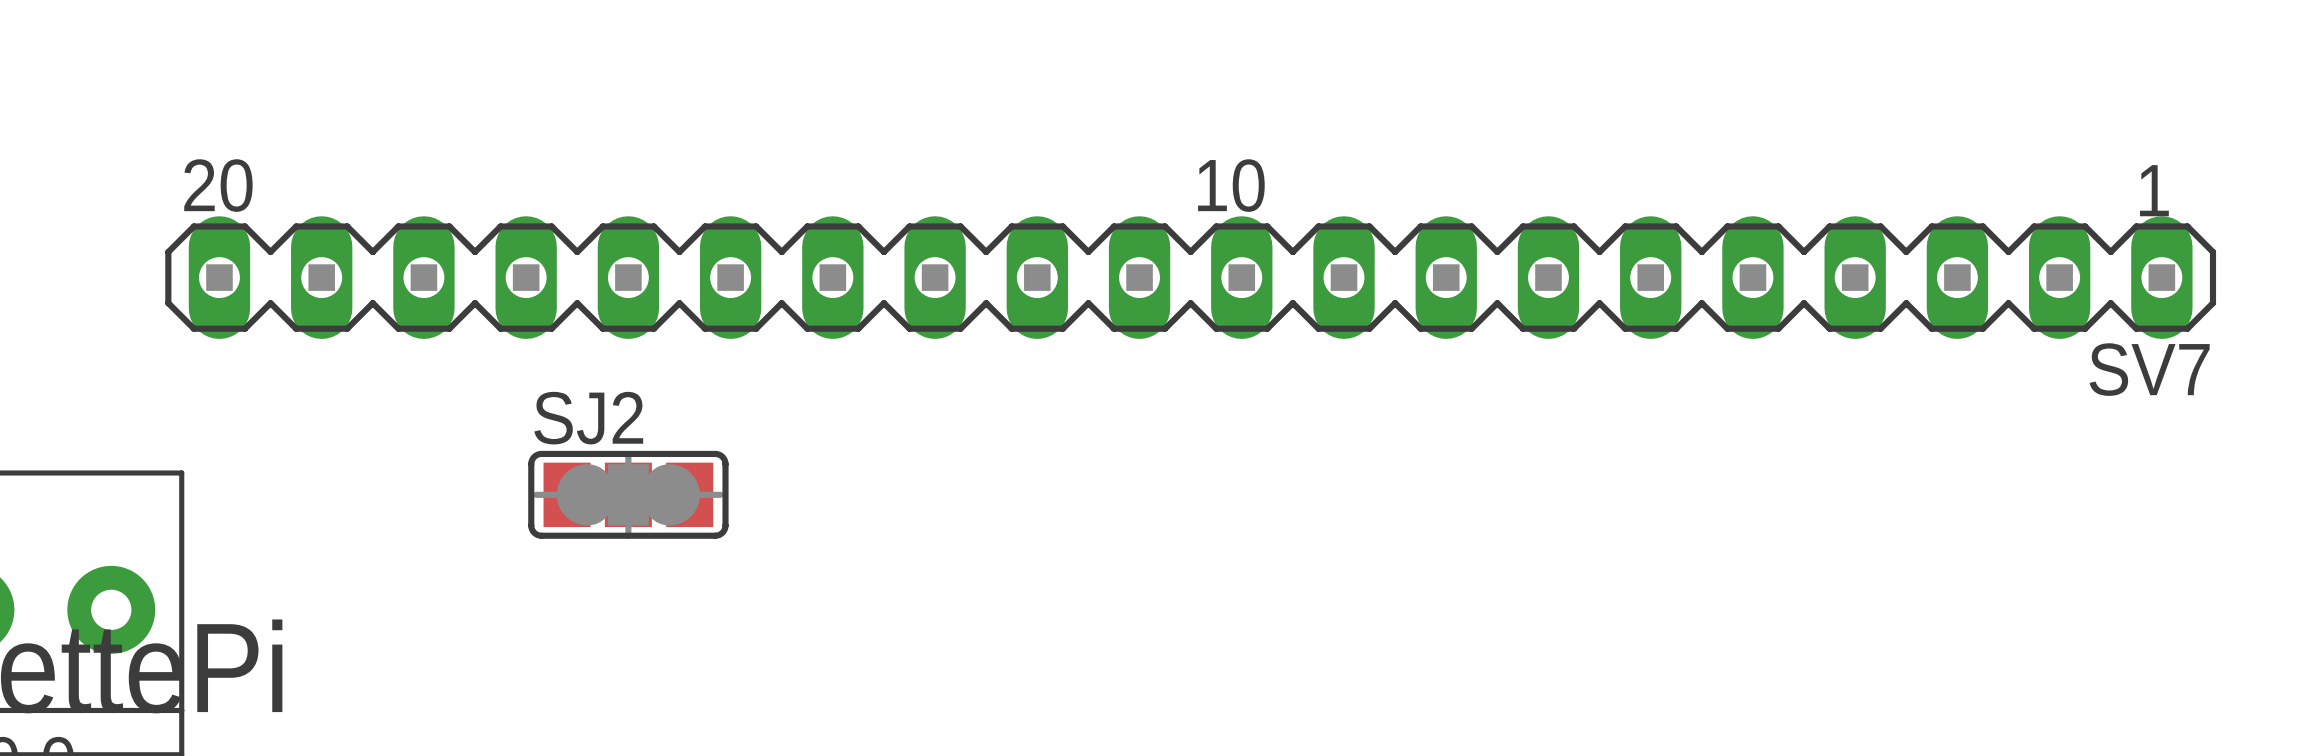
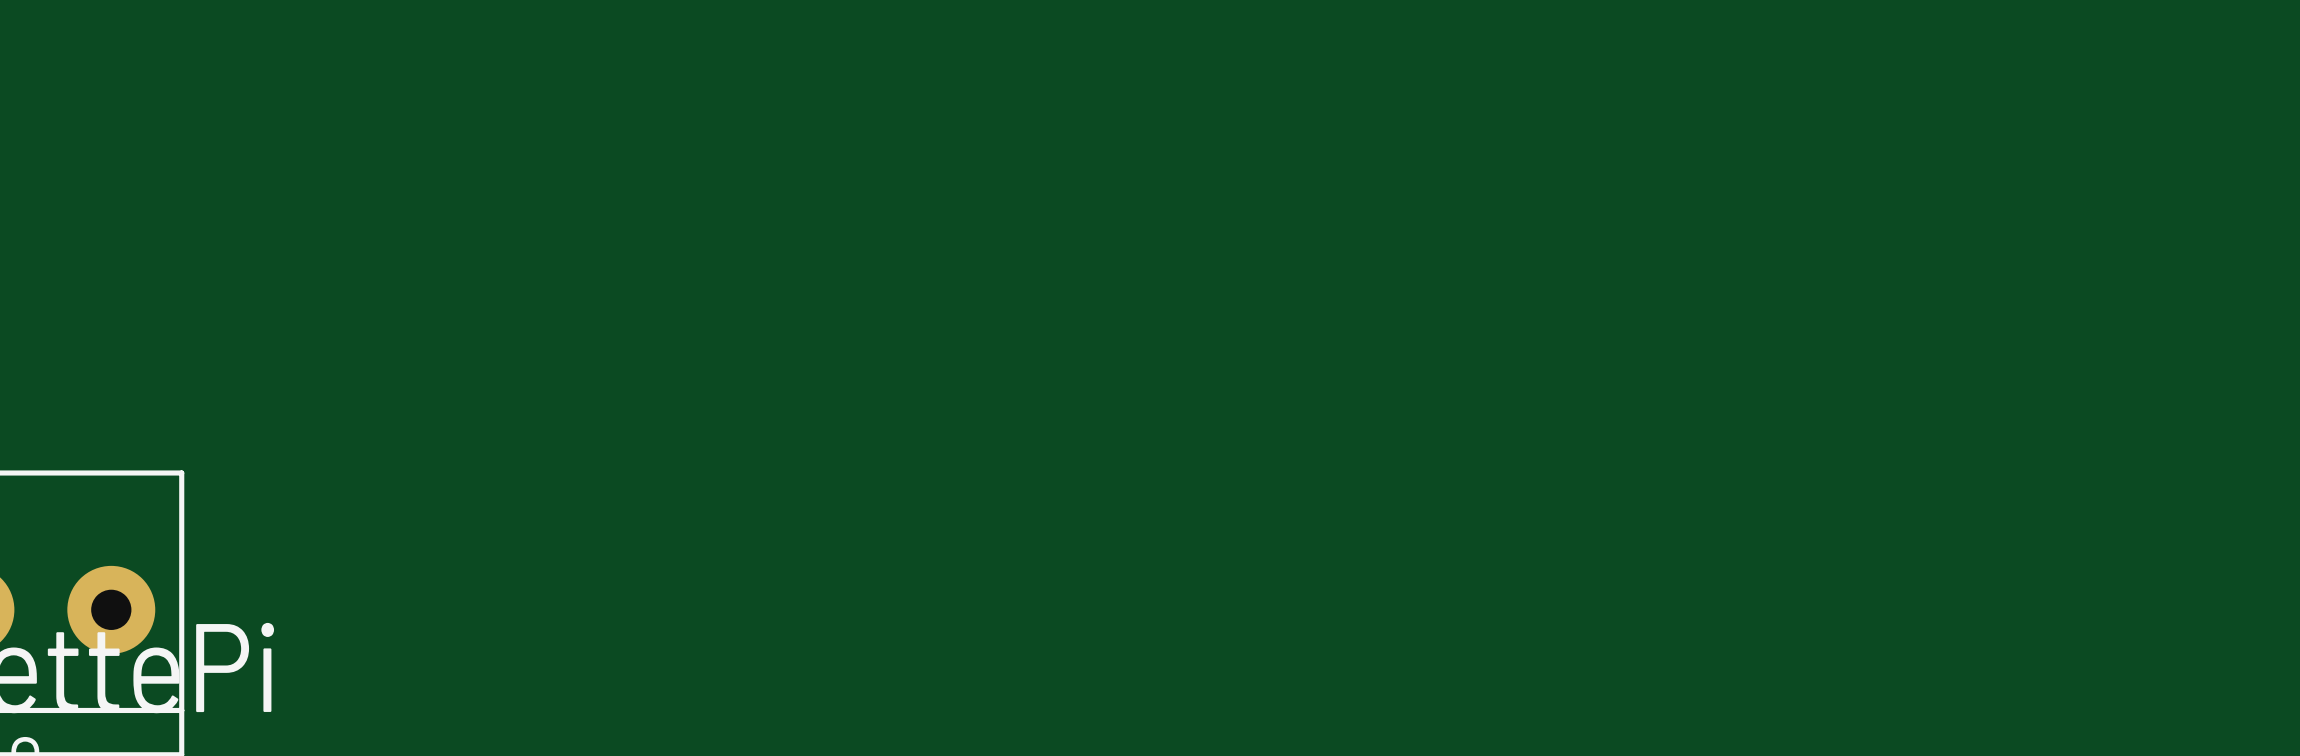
SV7: (1190, 277) -> none
SJ2: (628, 494) -> none

